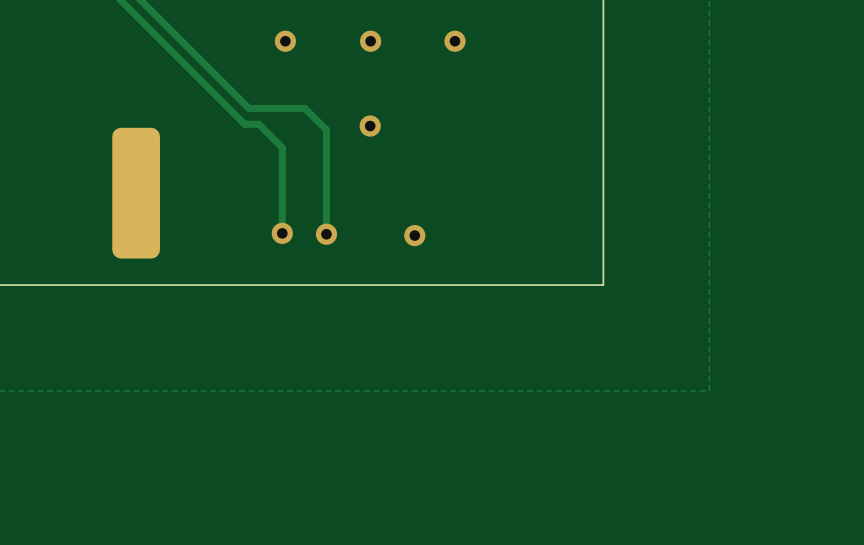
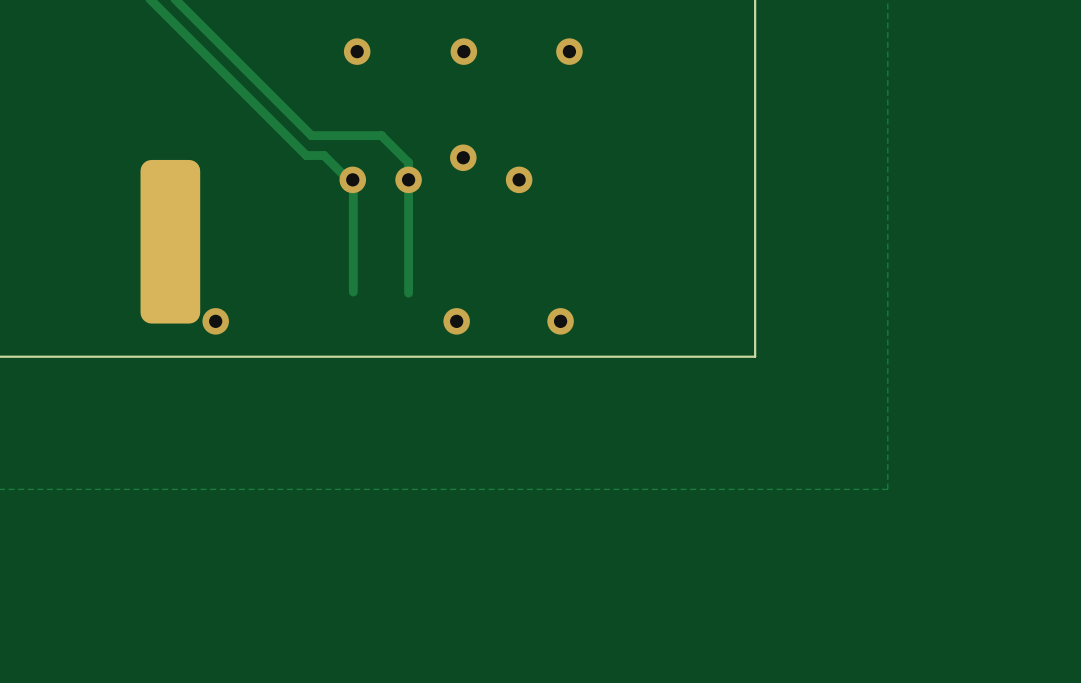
via: none -> (352, 179)
via: none -> (408, 179)
via: none -> (519, 179)
via: (282, 233) -> none
via: (326, 234) -> none
via: (414, 235) -> none
via: none -> (215, 321)
via: none -> (456, 321)
via: none -> (560, 321)

